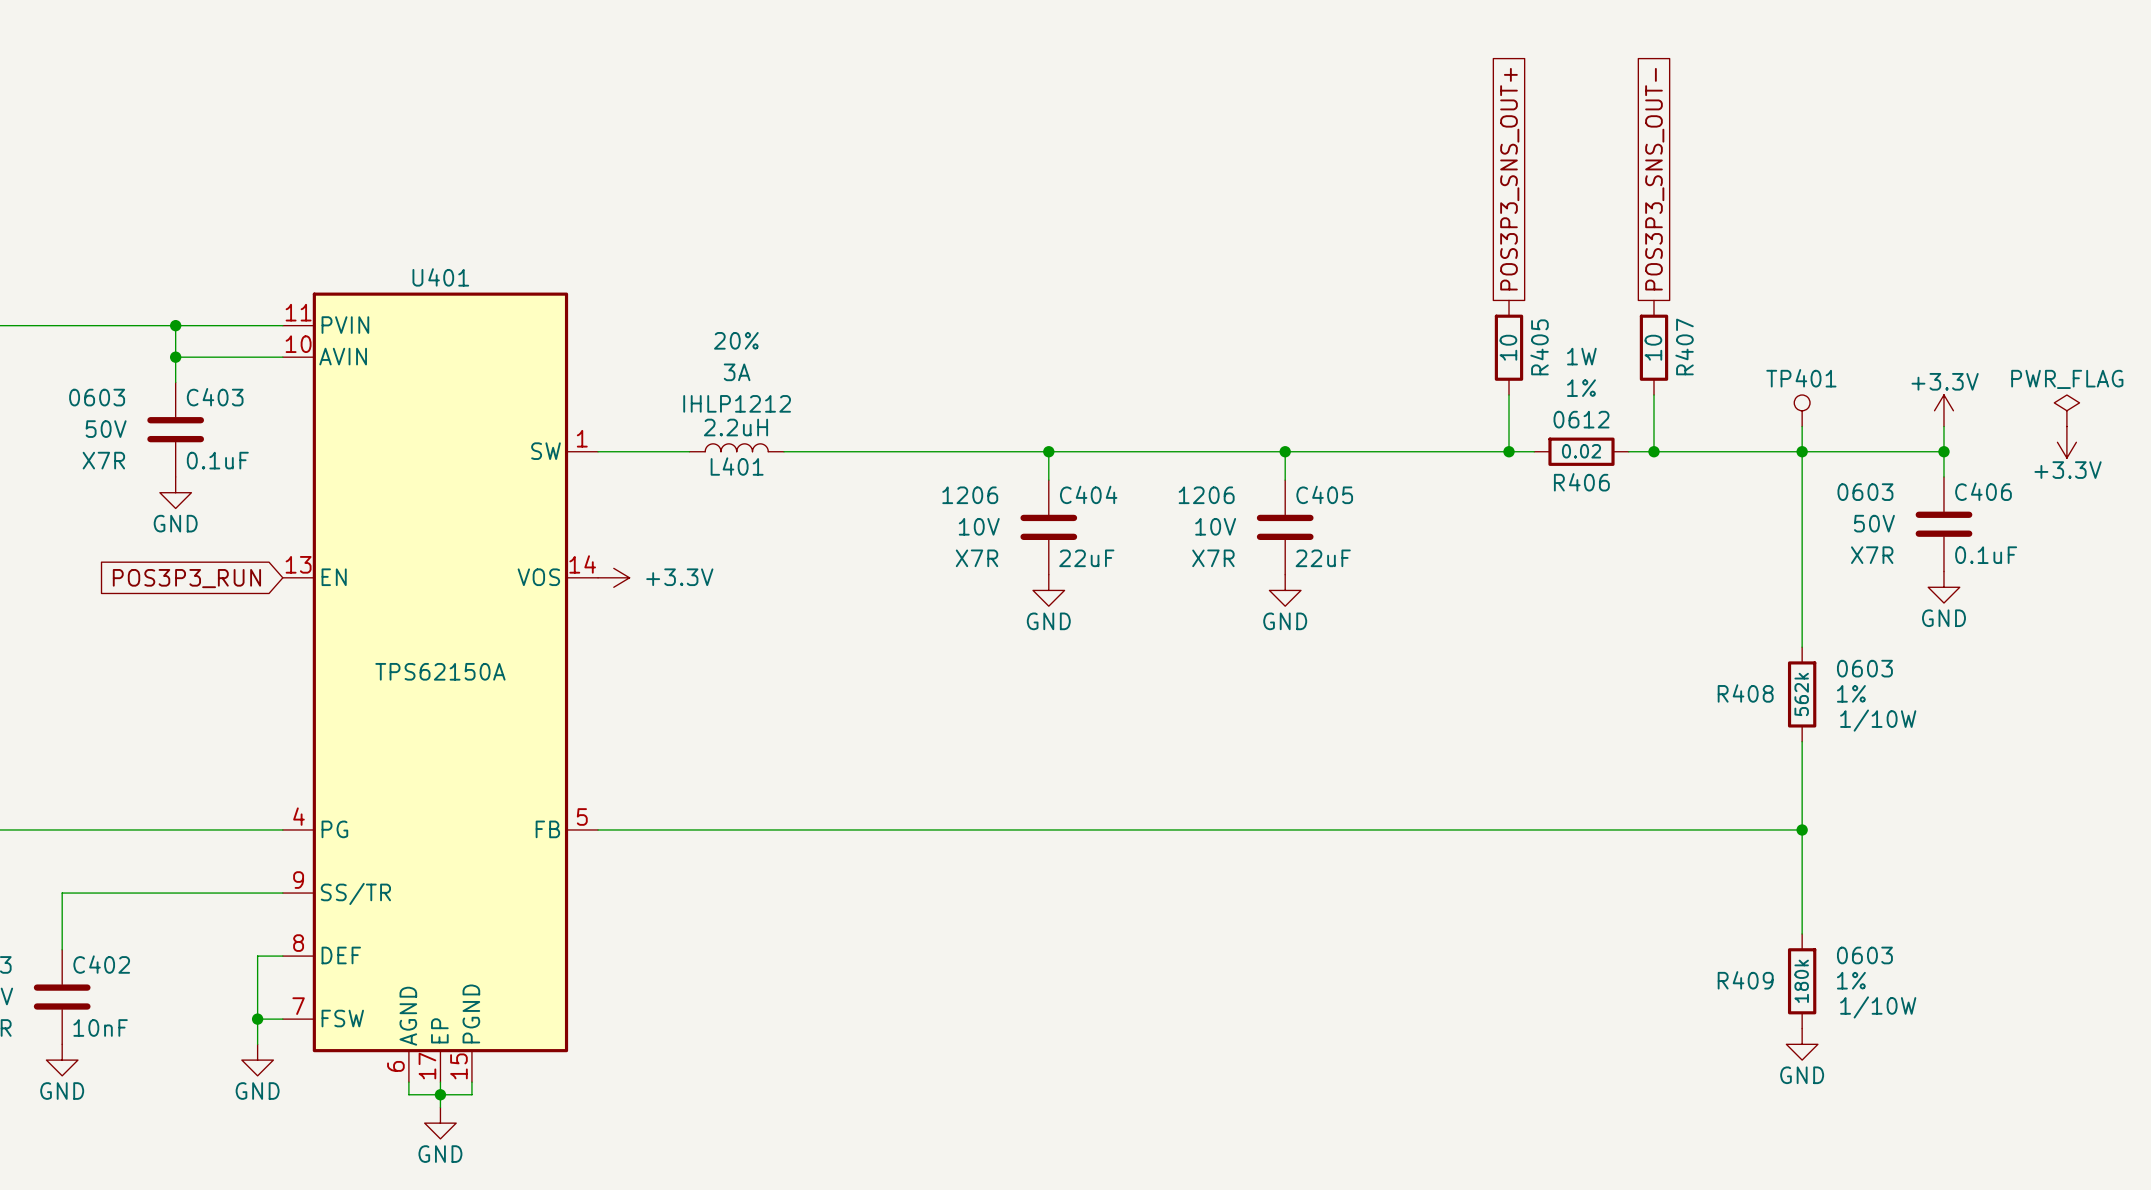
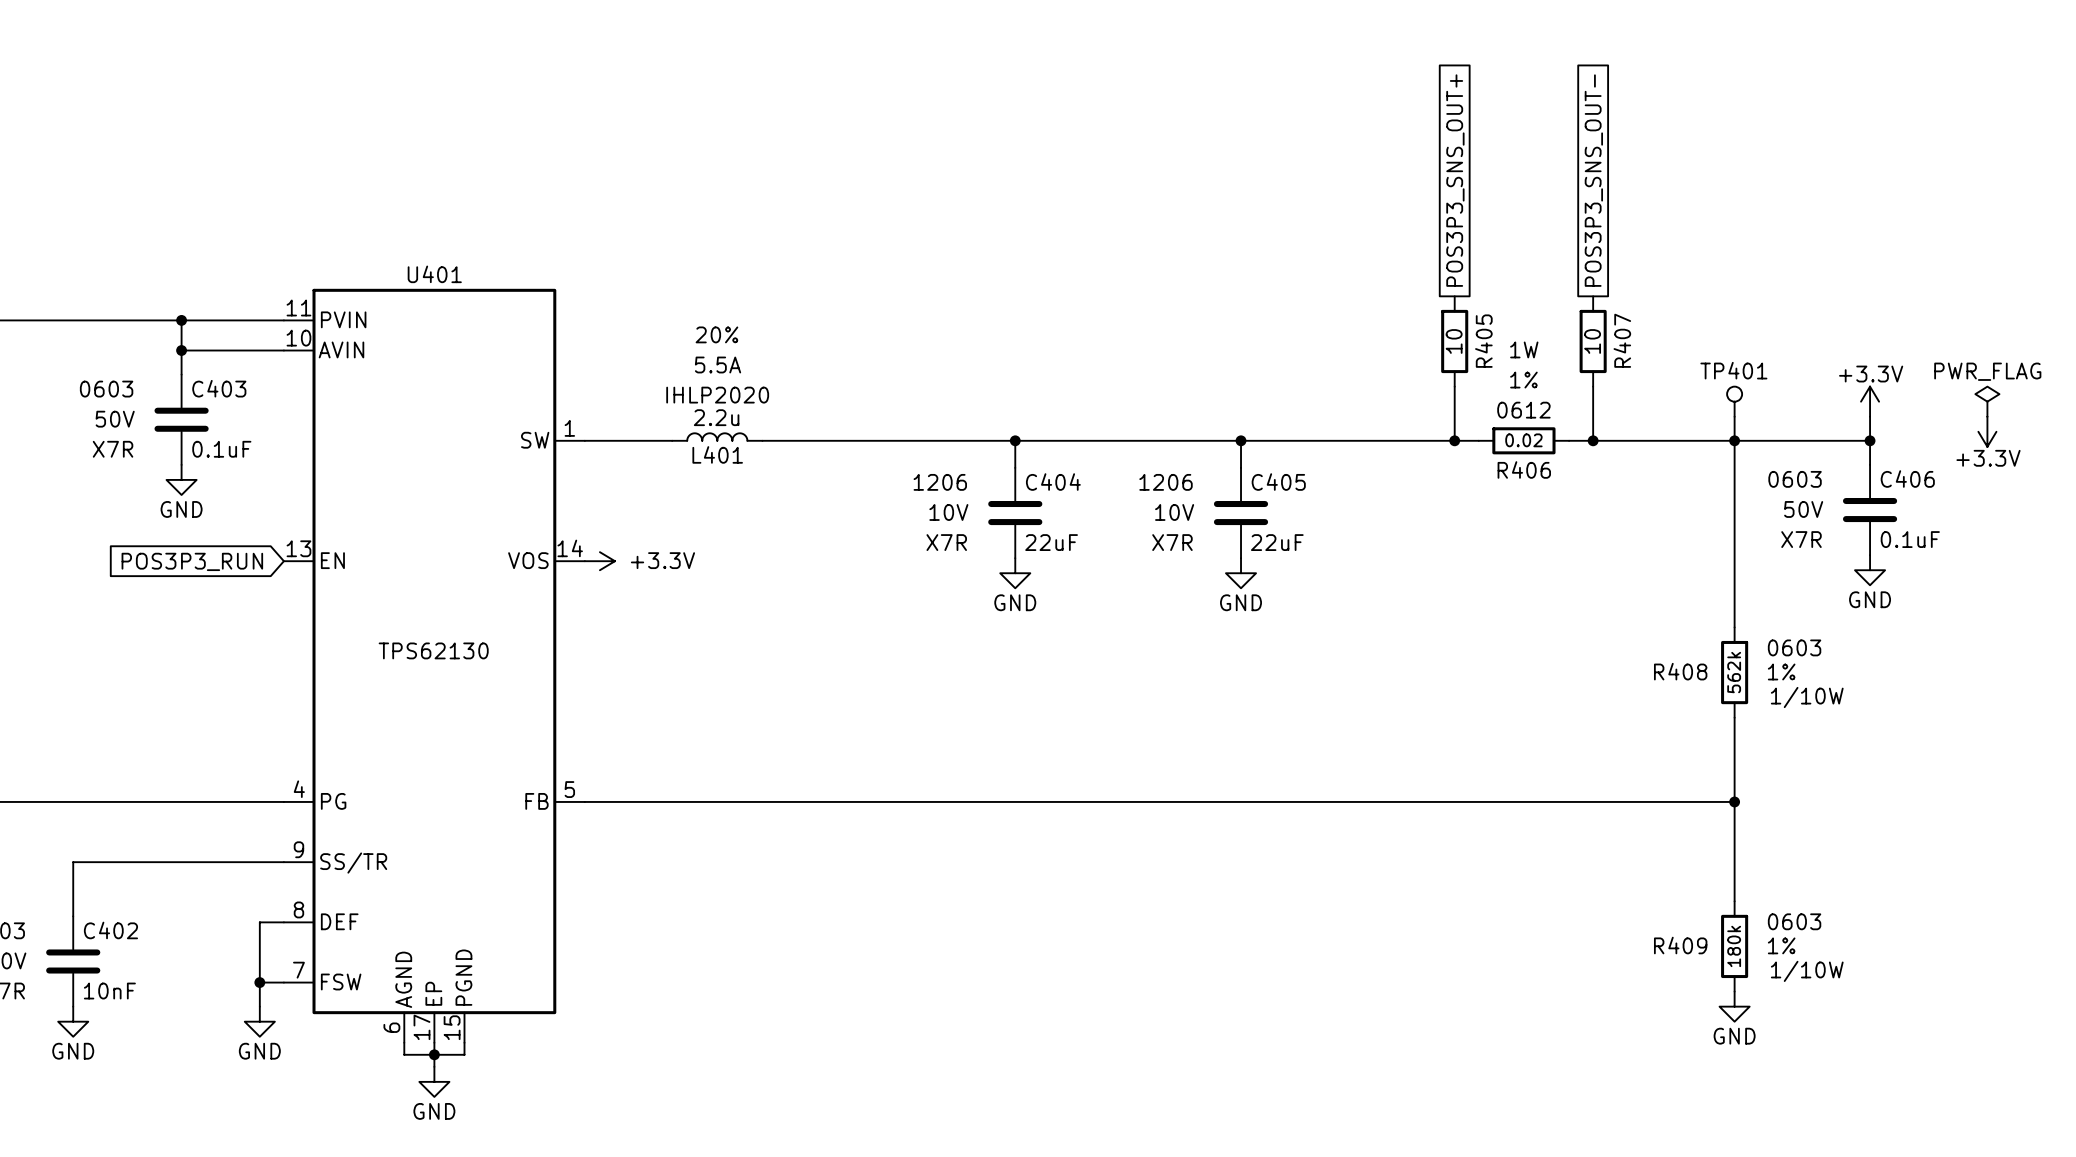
L401 text: 3A (737, 372) -> 5.5A (718, 365)
L401 text: IHLP1212 (737, 403) -> IHLP2020 (717, 395)
L401 value: 2.2uH (735, 427) -> 2.2u (716, 417)
U401 value: TPS62150A (440, 671) -> TPS62130 (433, 650)

